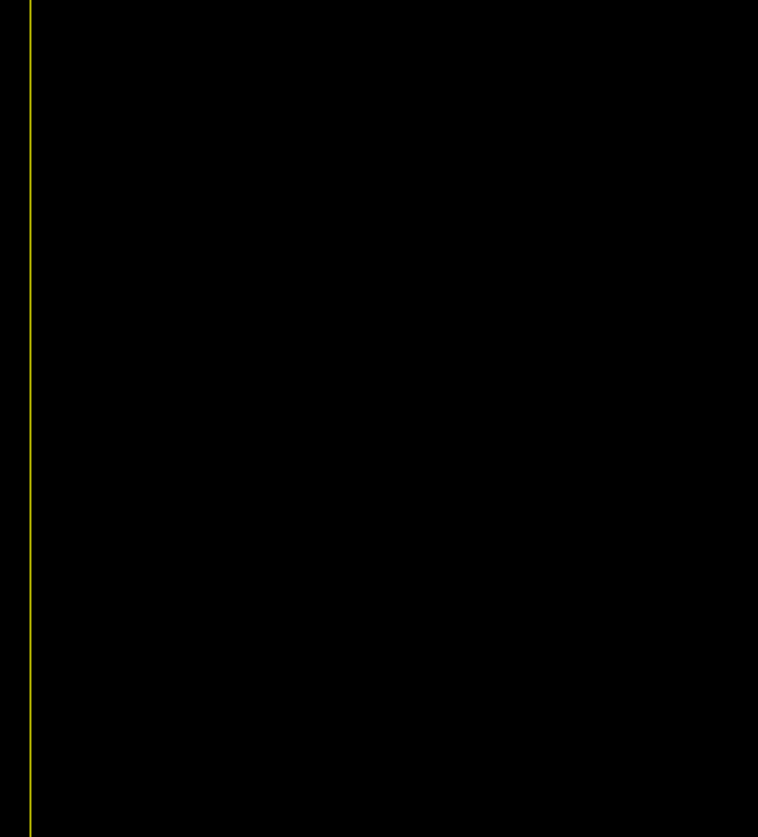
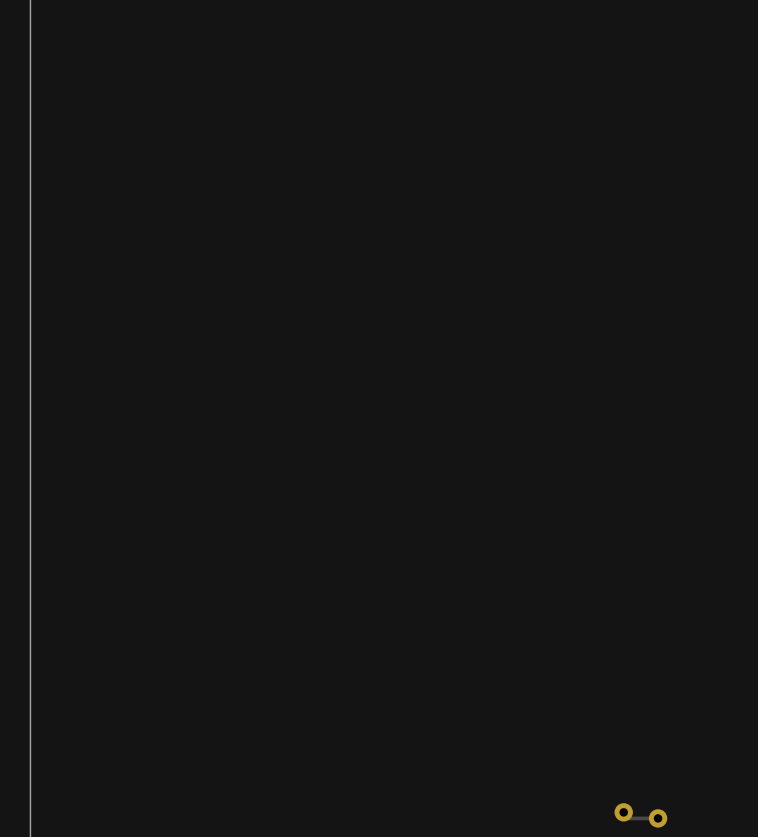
track: none -> (623, 812) (629, 818) (658, 818)
via: none -> (623, 812)
via: none -> (658, 818)

